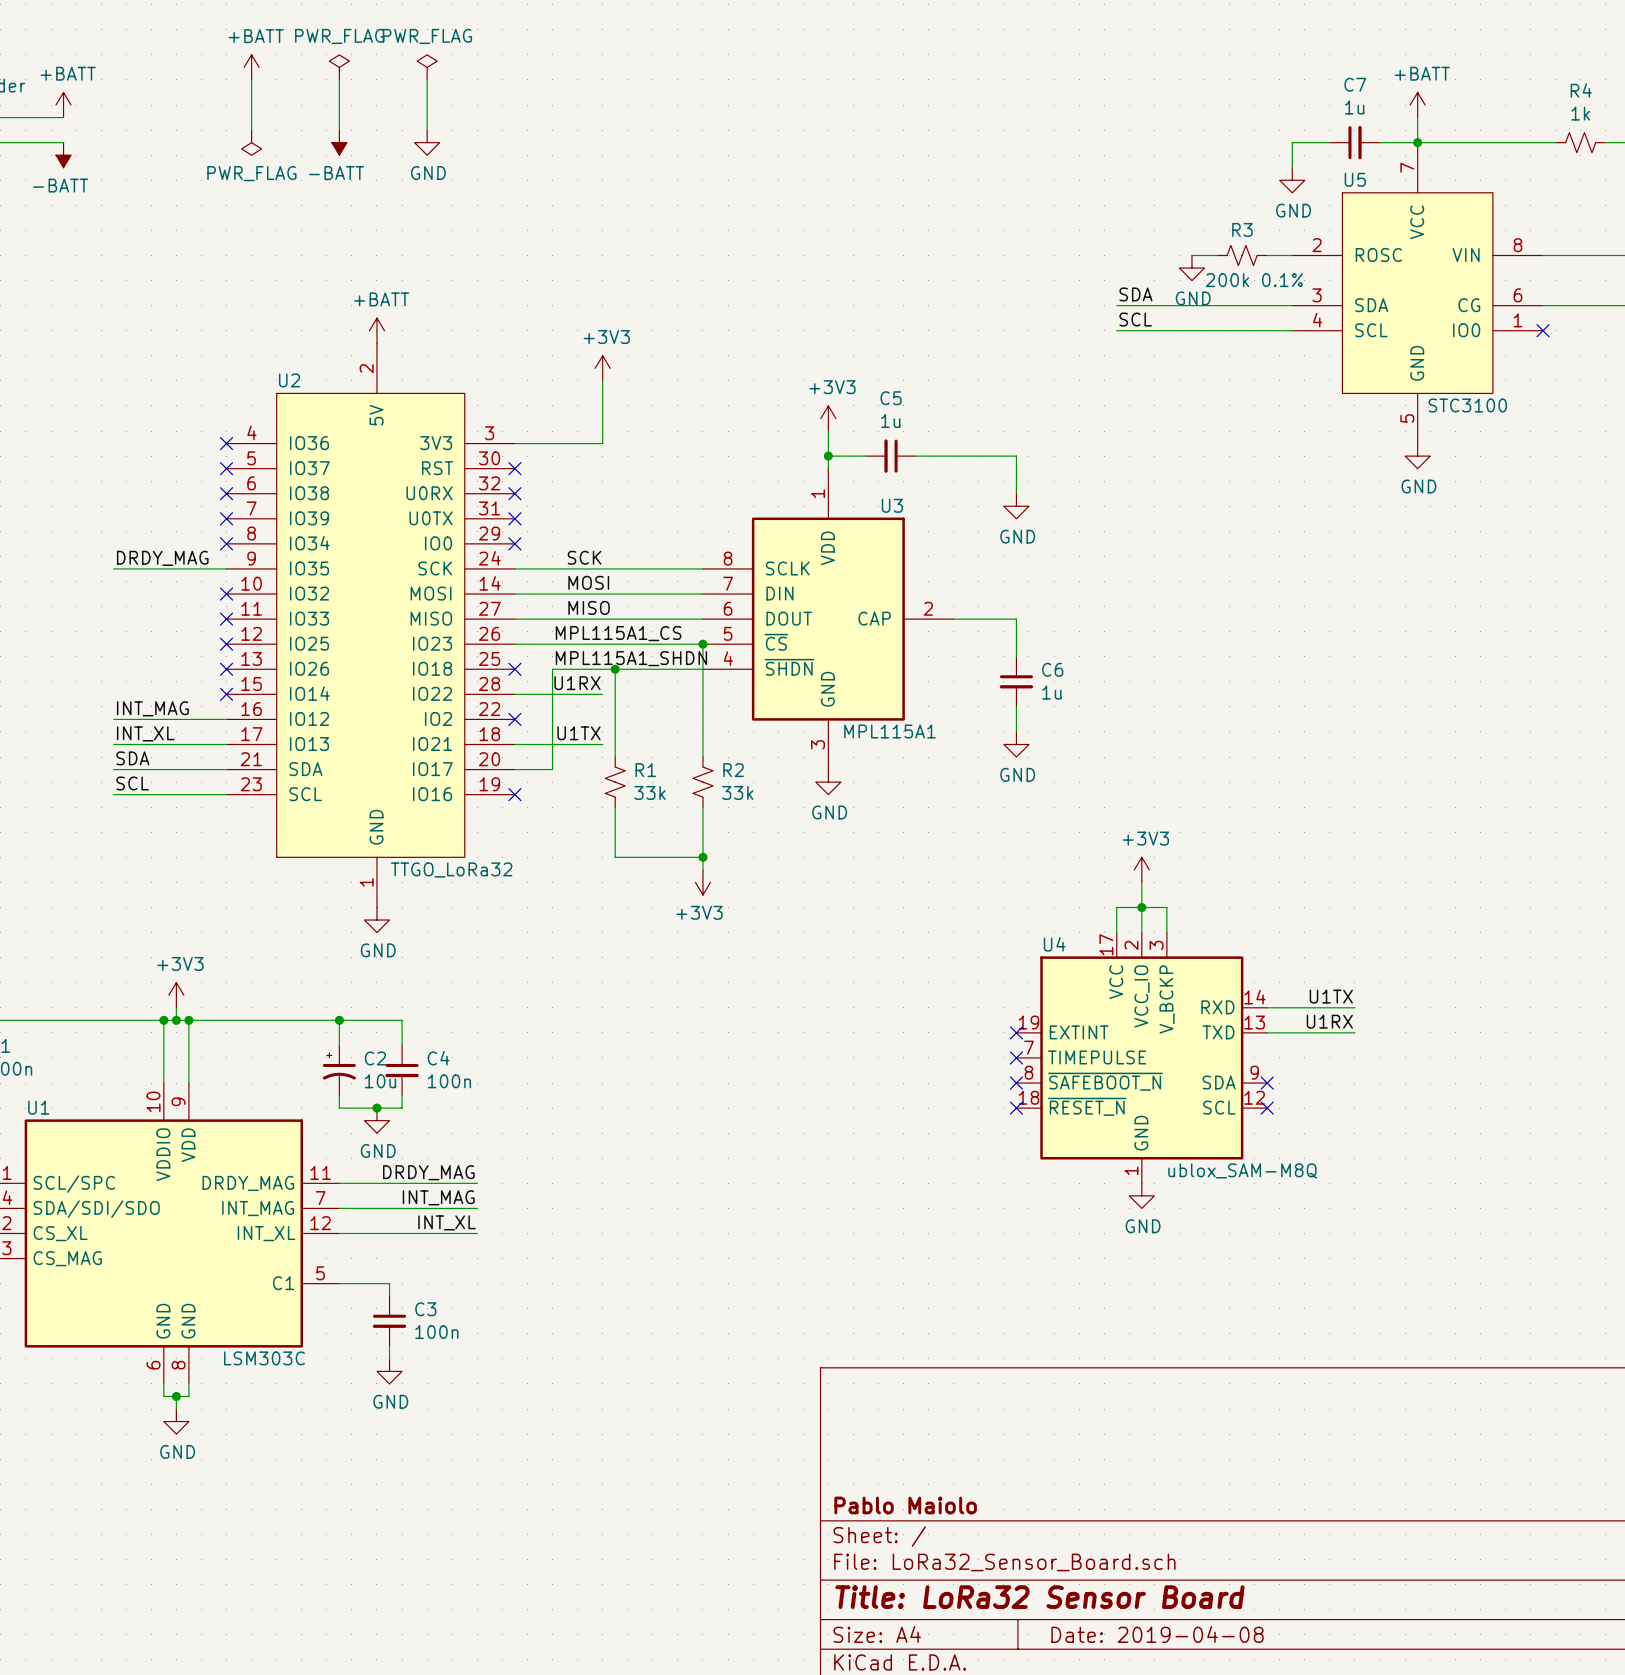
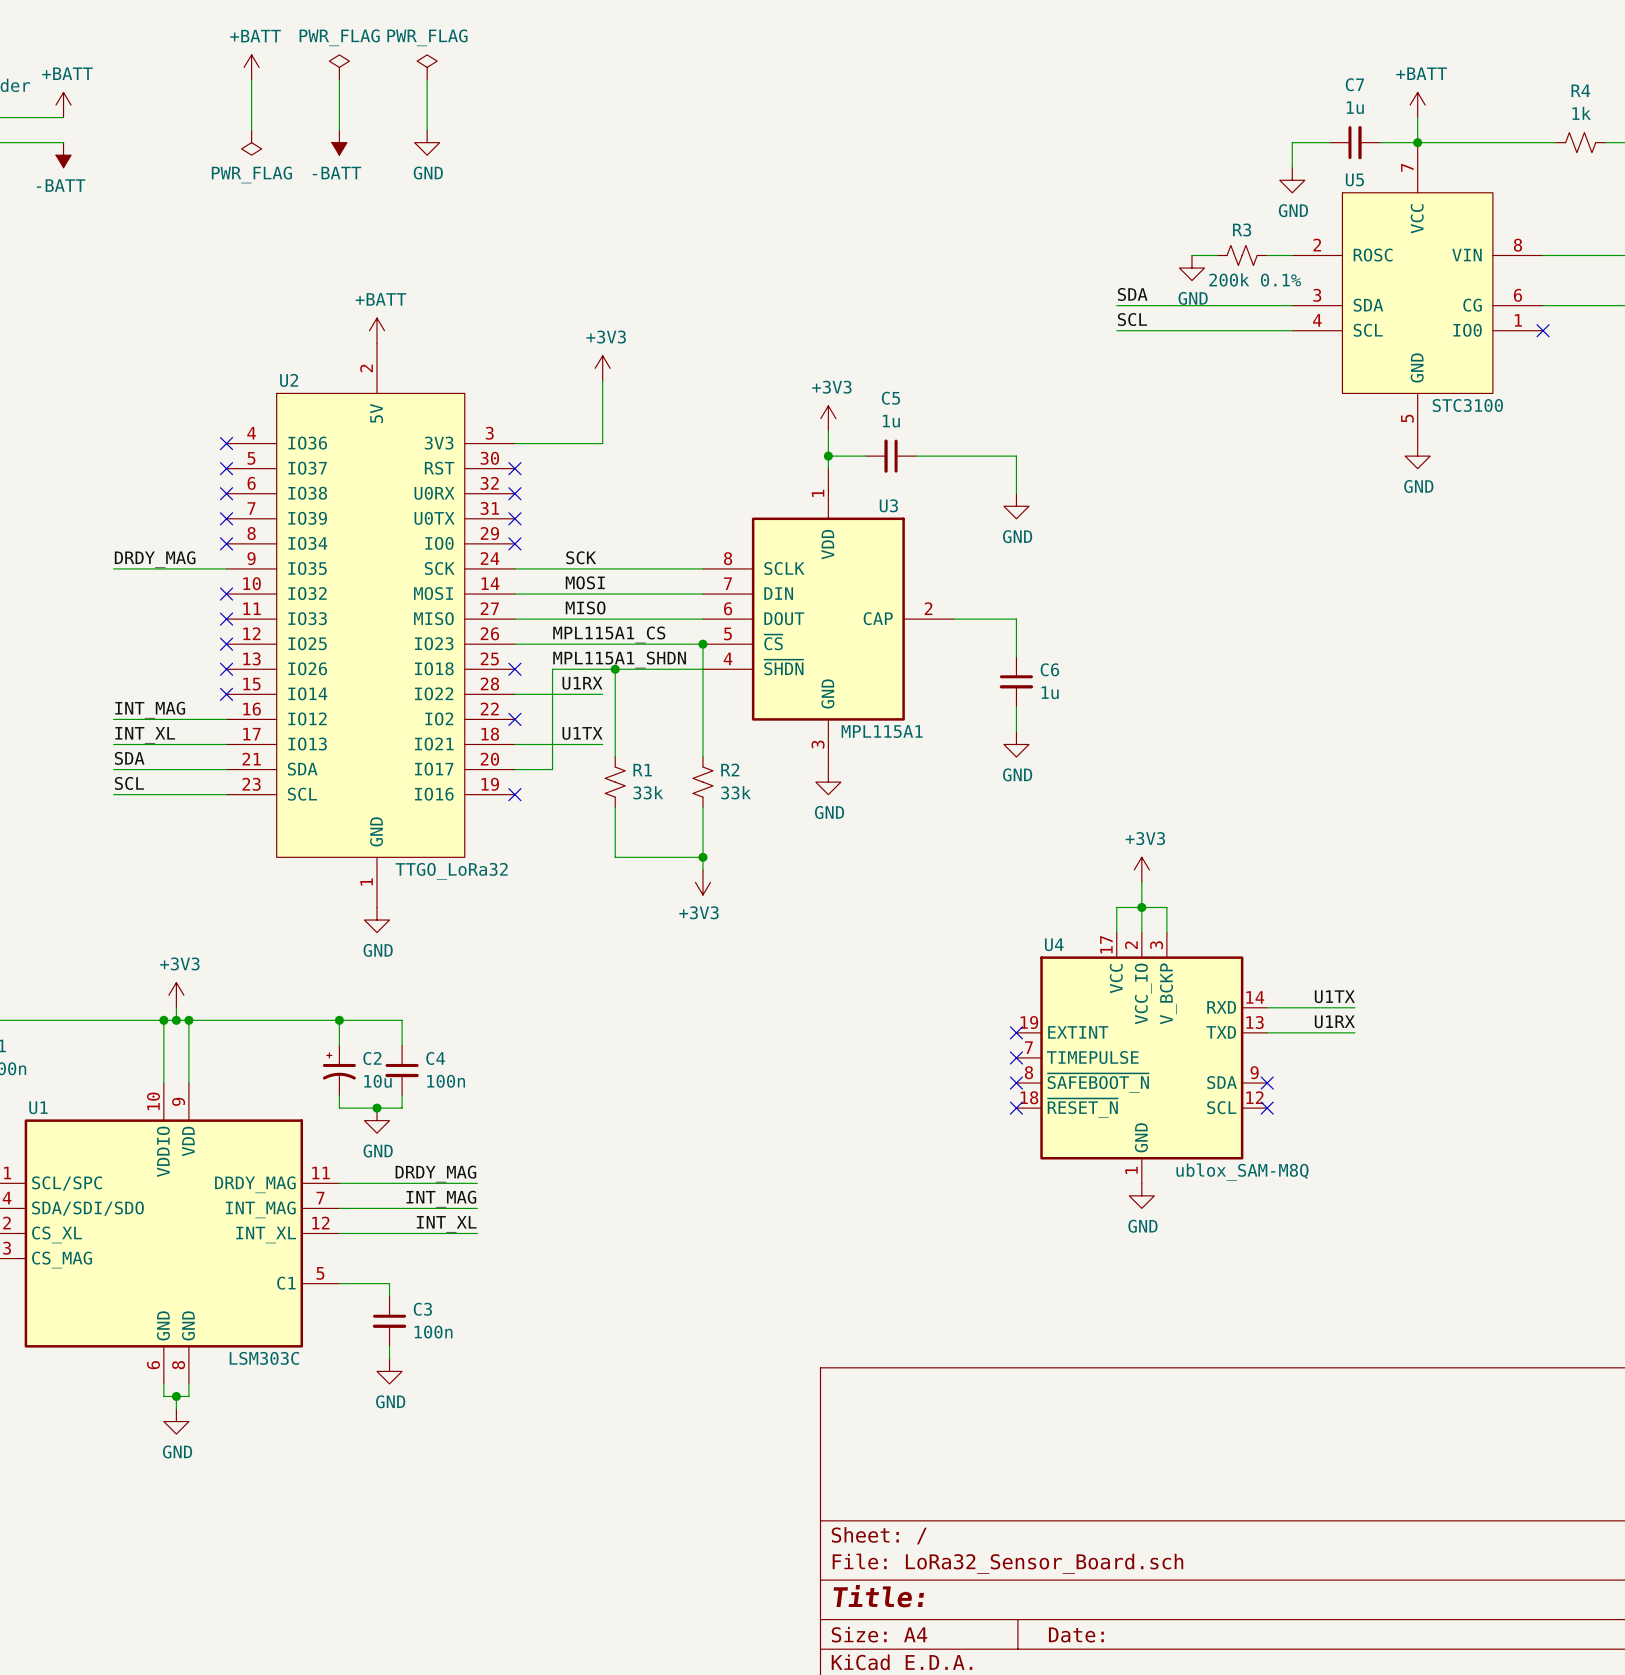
title block: Pablo Maiolo (905, 1505) -> none
title block: Title: LoRa32 Sensor Board (1039, 1597) -> Title: (878, 1596)
title block: Date: 2019-04-08 (1157, 1634) -> Date: (1076, 1634)

